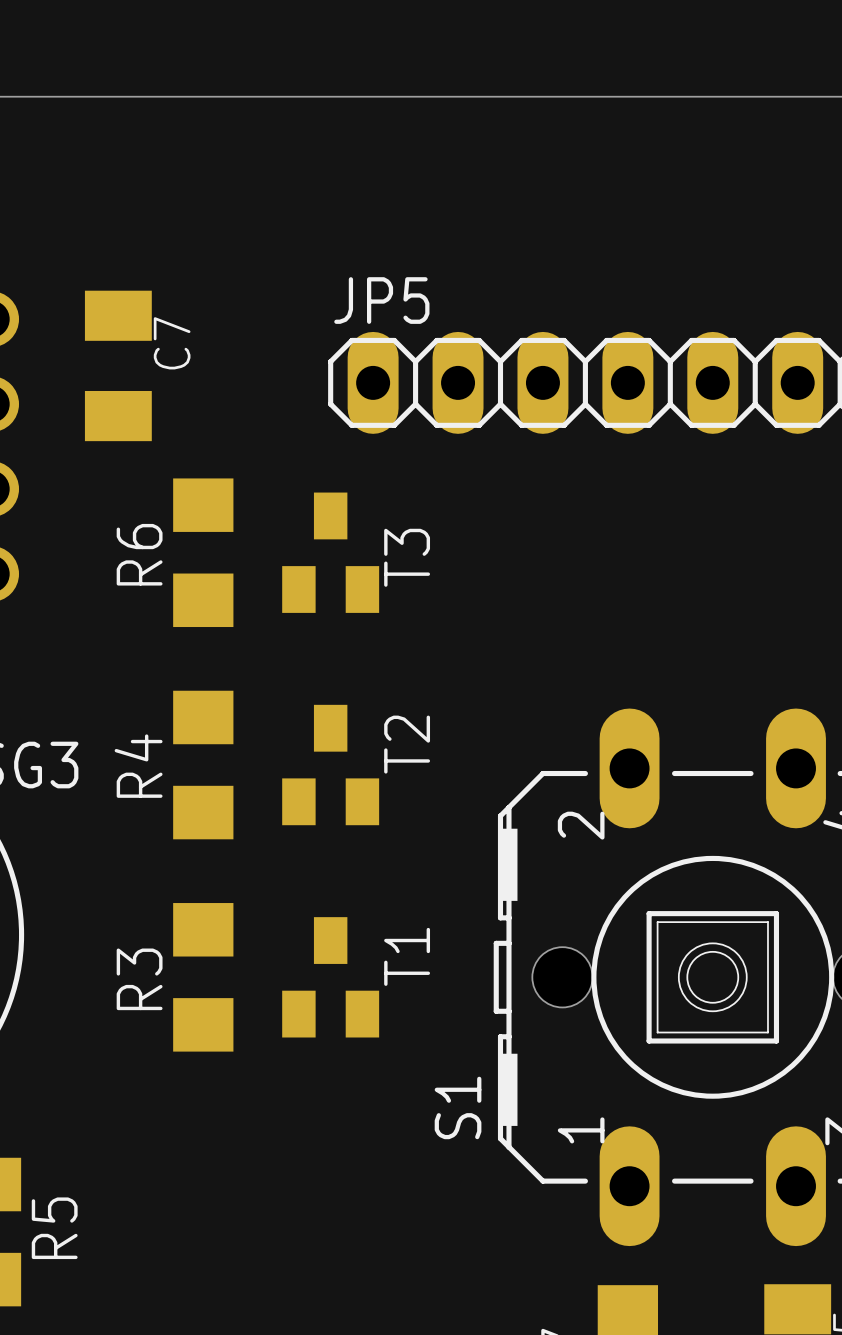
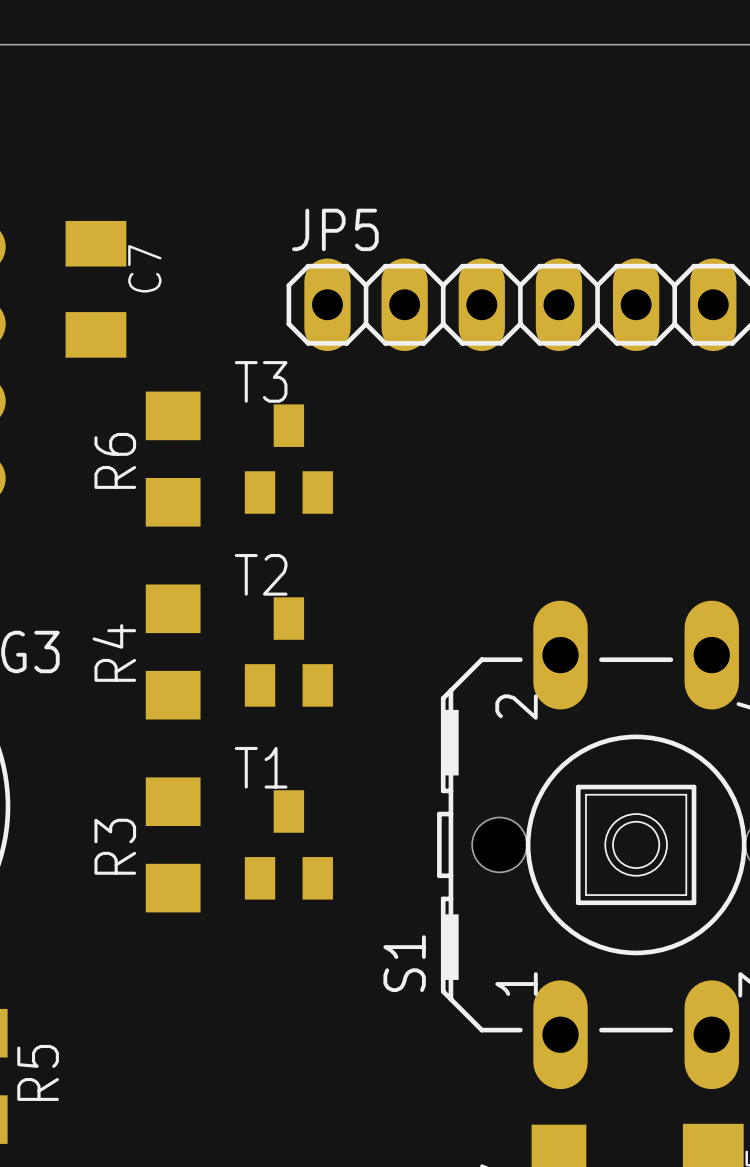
T3 name rotation: 0° (407, 557) -> 90° clockwise (261, 381)
T3 name position: T3 (407, 557) -> T3 (261, 381)
T2 name rotation: 0° (407, 744) -> 90° clockwise (261, 574)
T2 name position: T2 (407, 744) -> T2 (261, 574)
T1 name rotation: 0° (407, 956) -> 90° clockwise (261, 767)
T1 name position: T1 (407, 956) -> T1 (261, 767)

